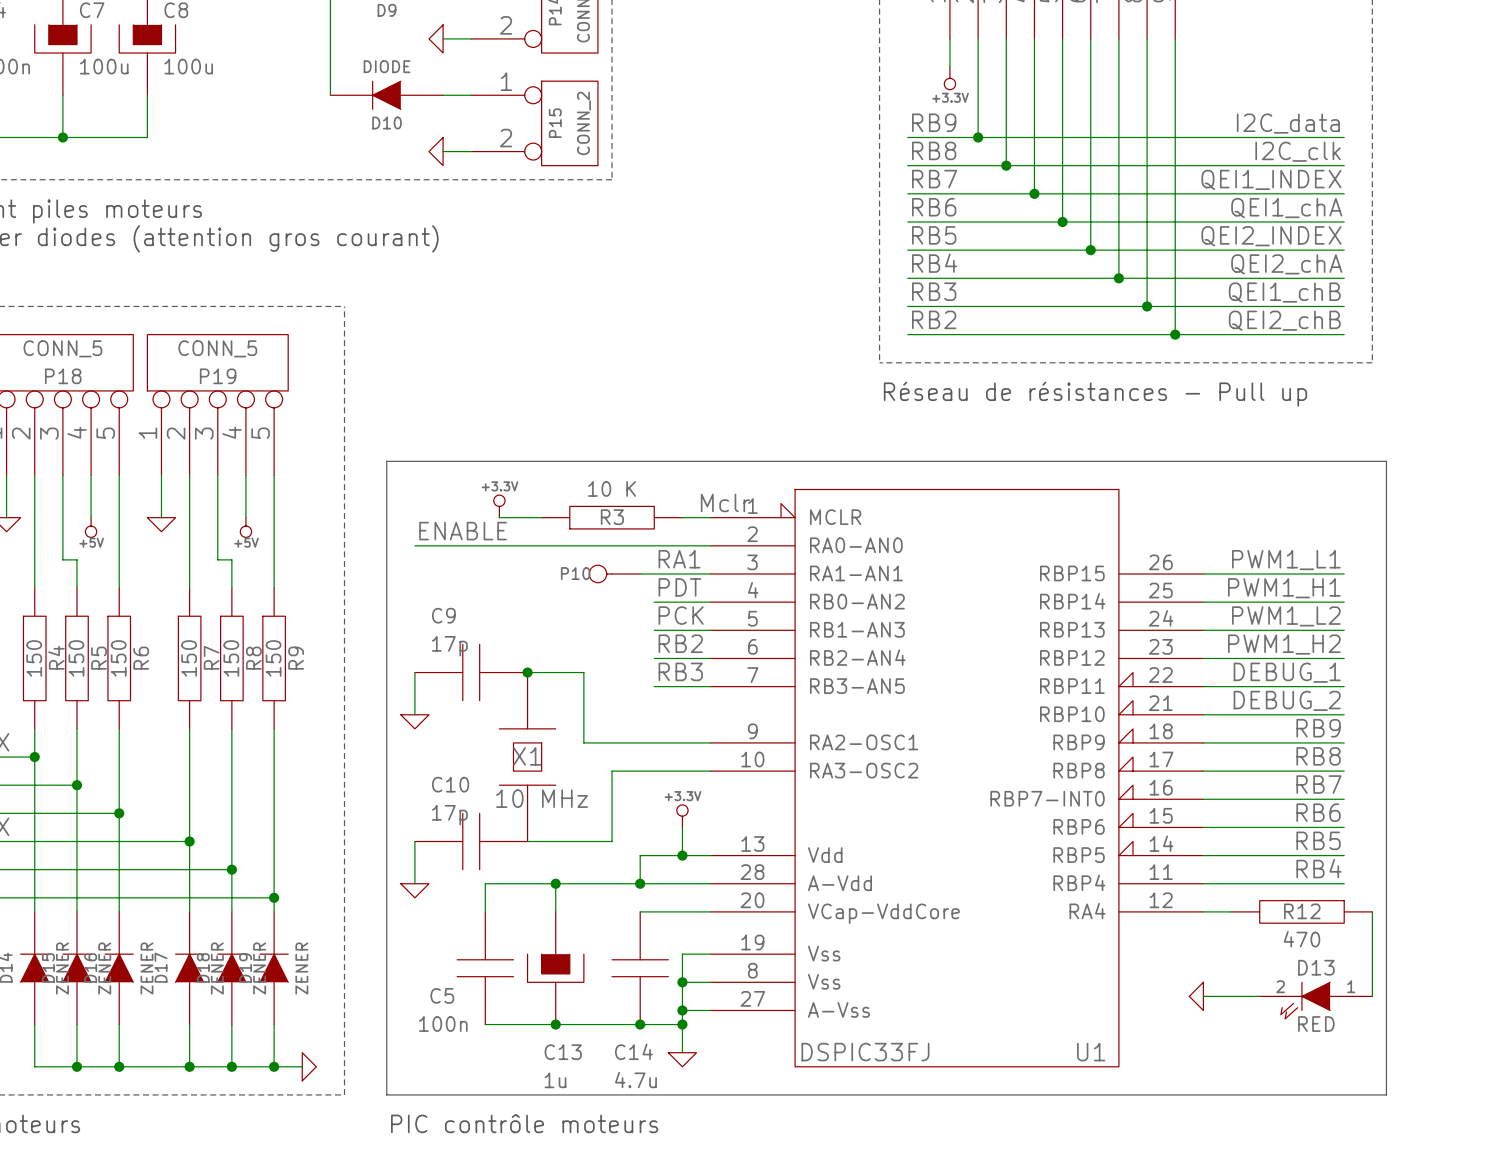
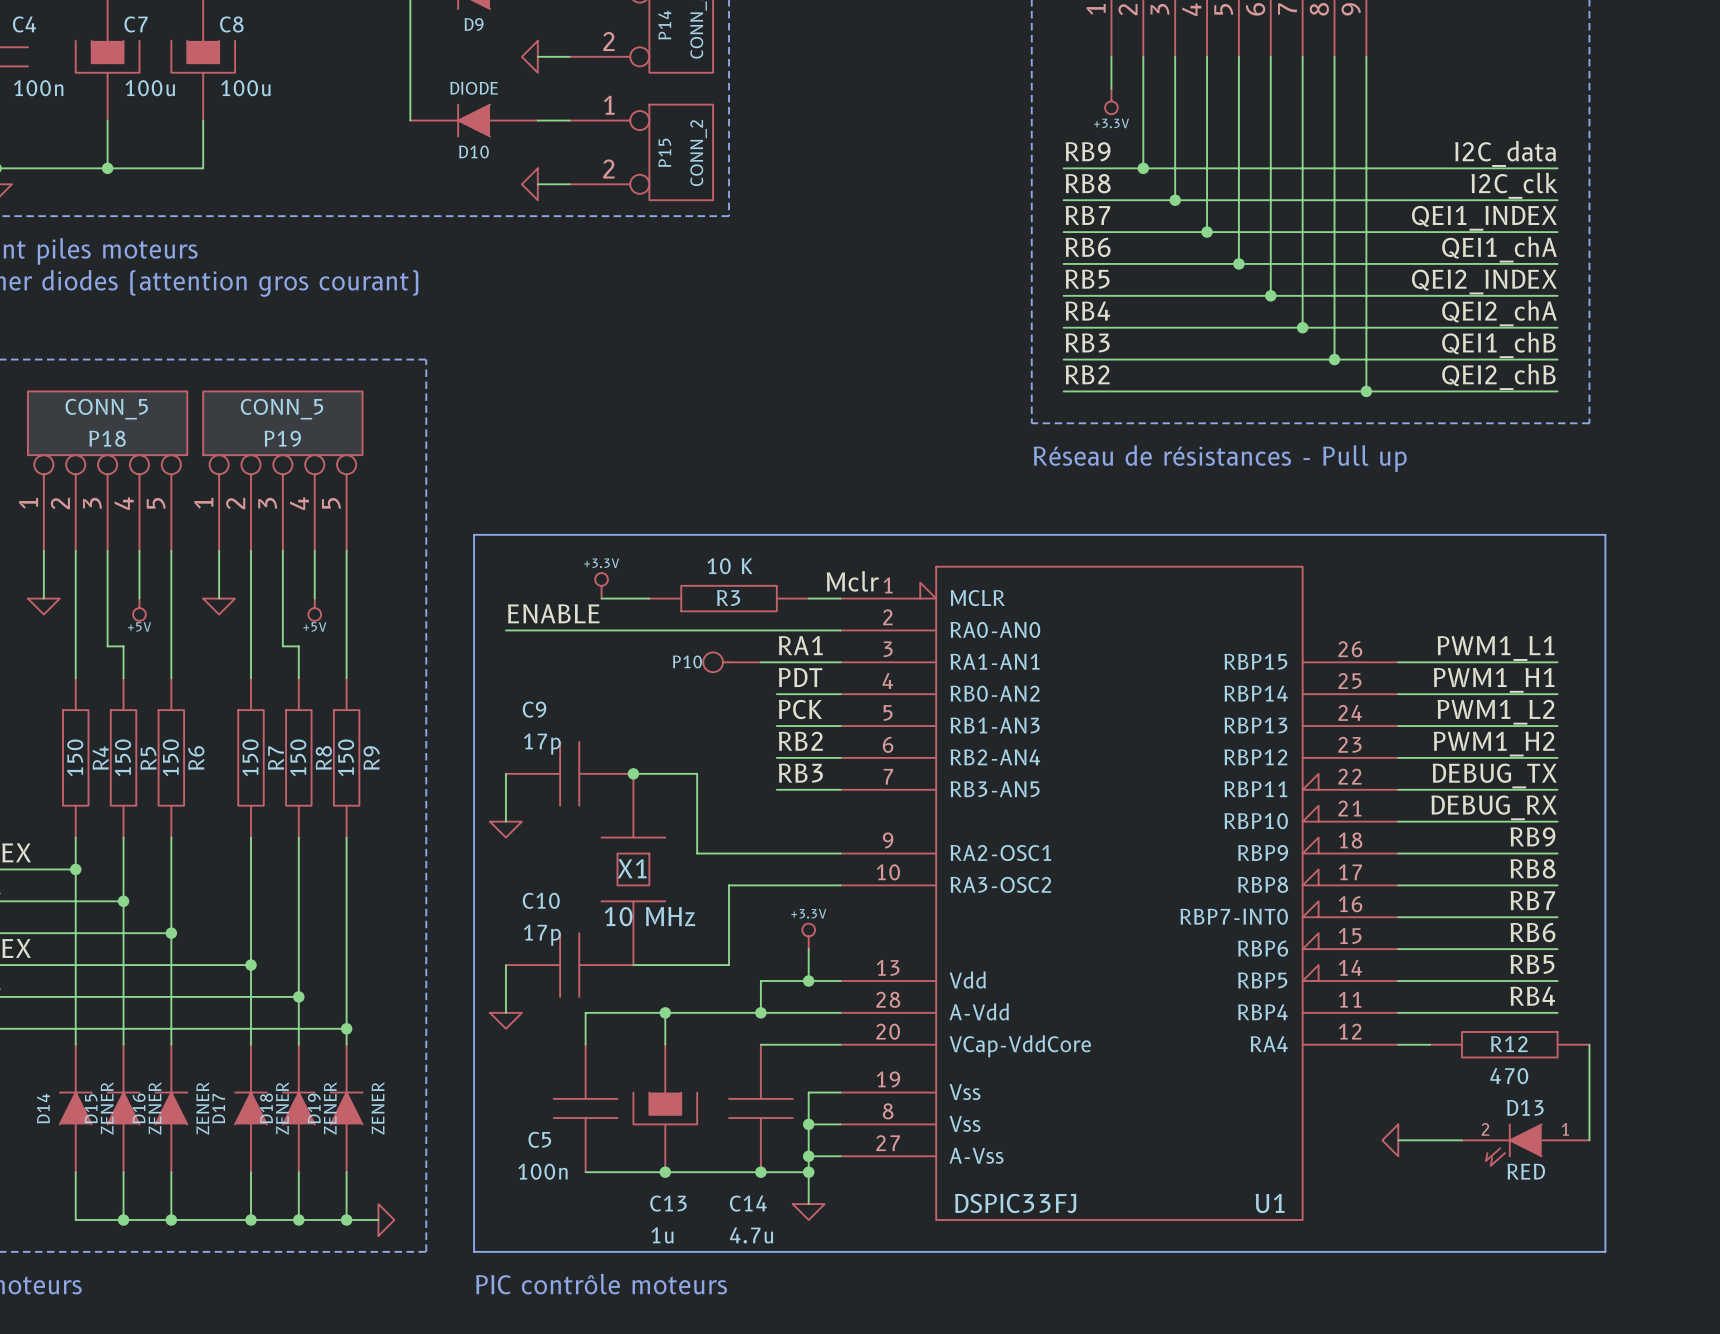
label: DEBUG_1 (1287, 672) -> DEBUG_TX (1494, 775)
label: DEBUG_2 (1287, 700) -> DEBUG_RX (1494, 807)

